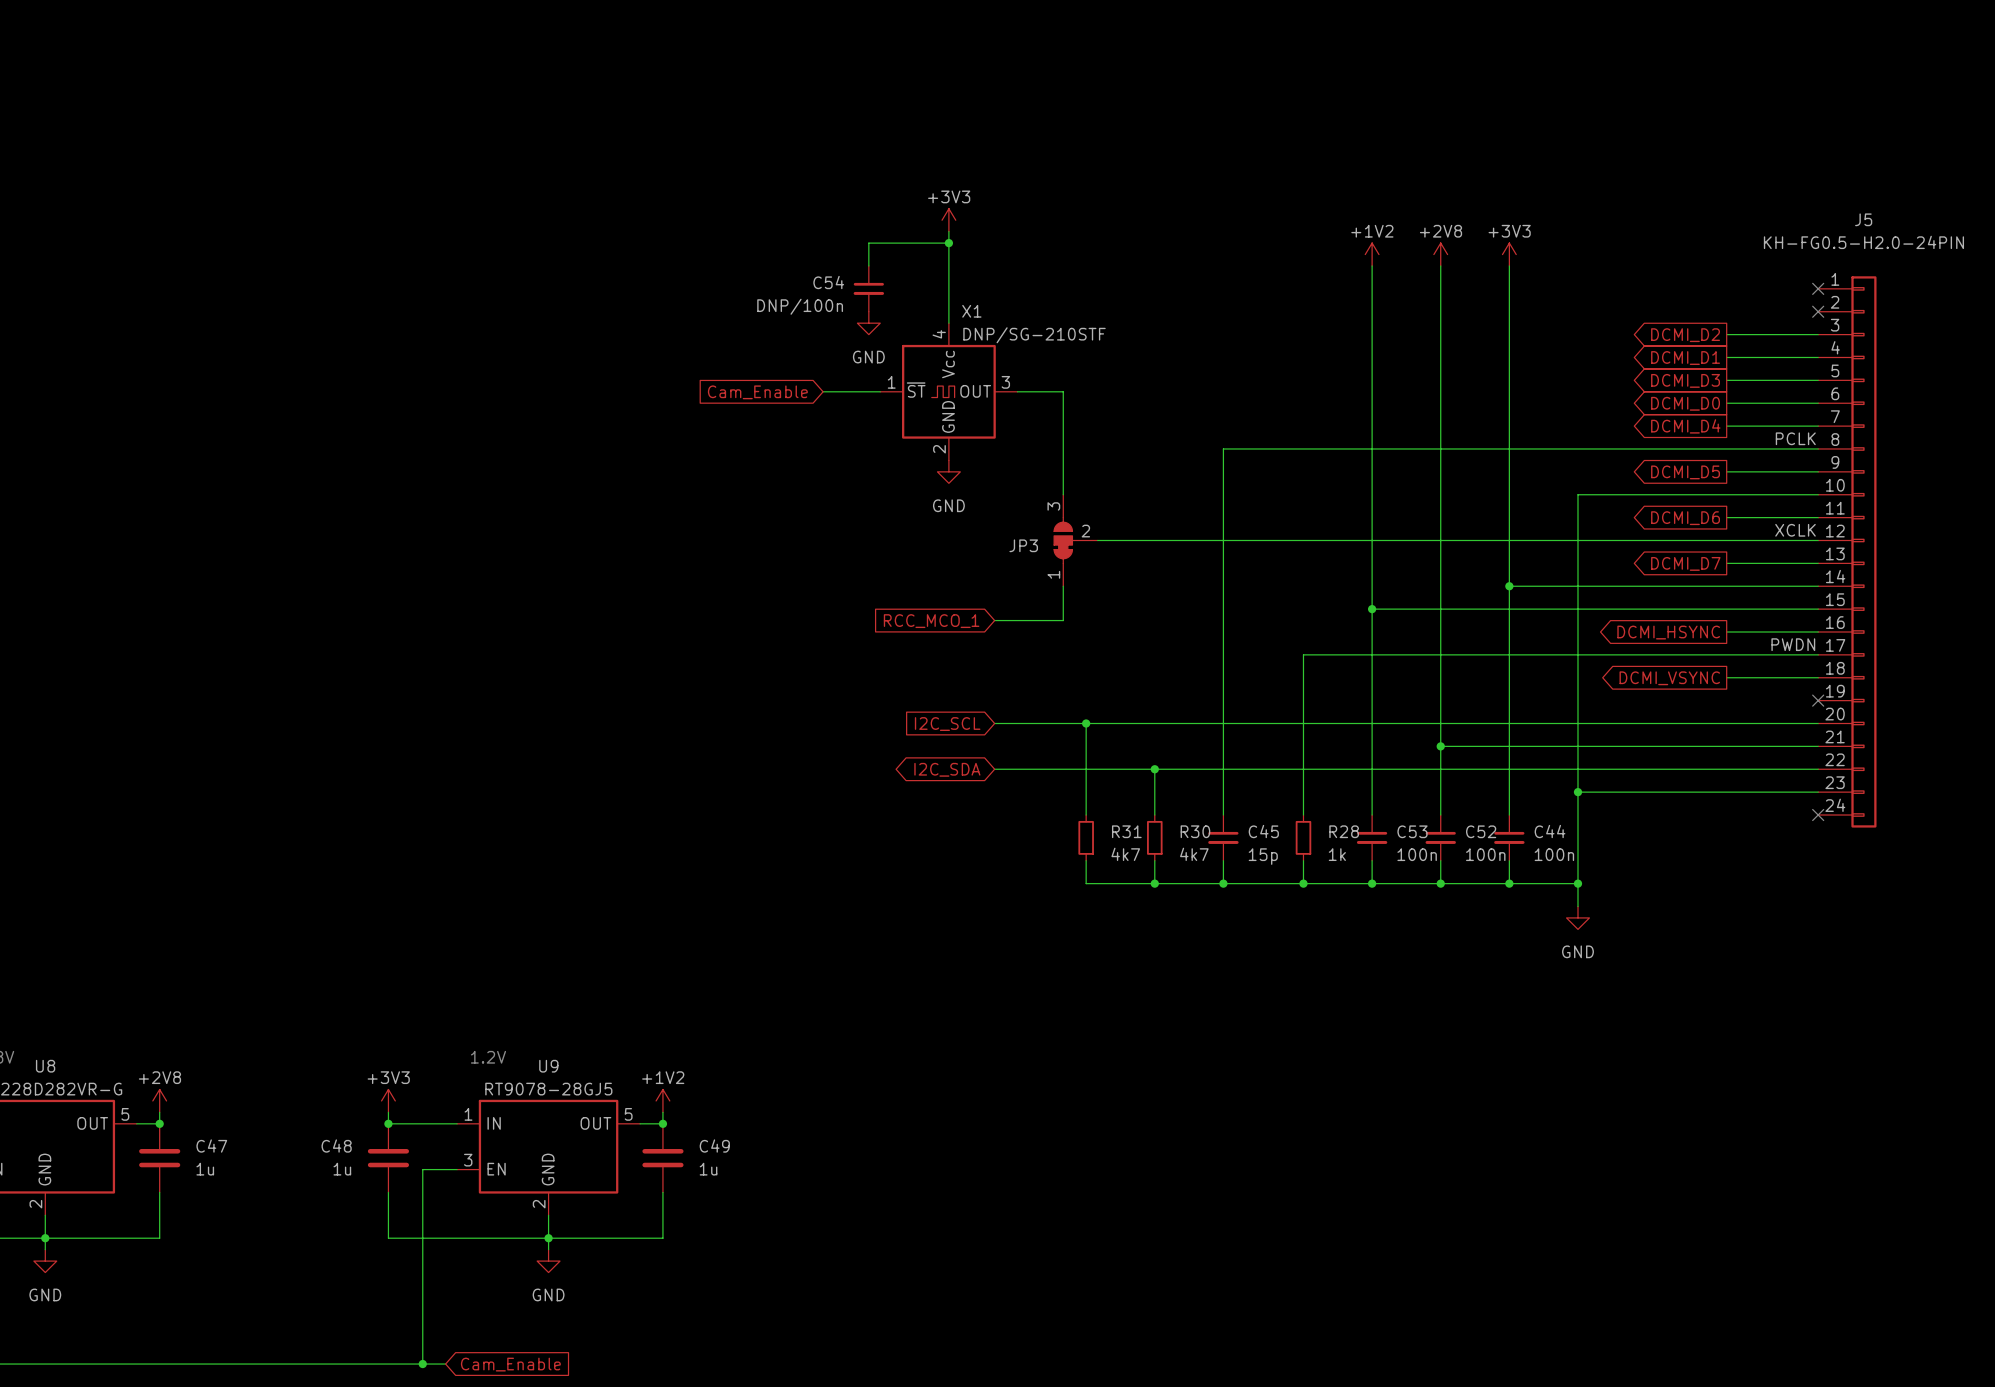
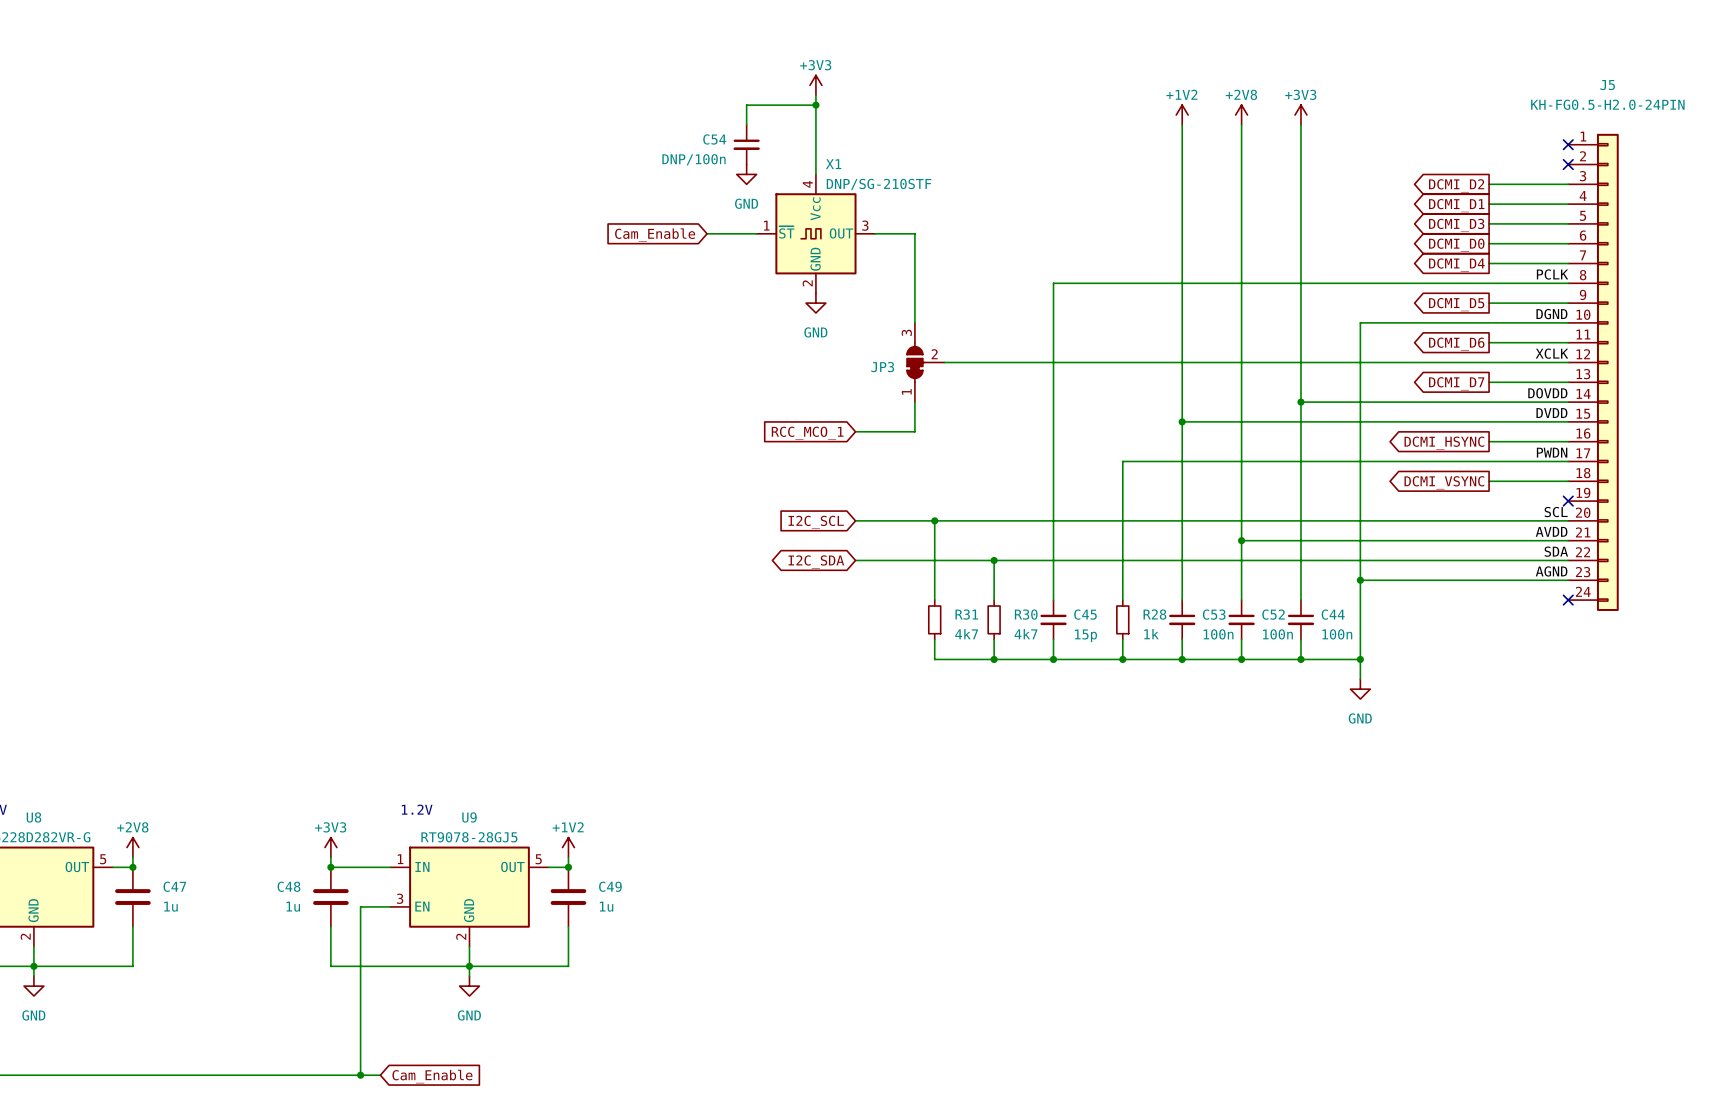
label: none -> DGND (1551, 314)
label: none -> DOVDD (1547, 393)
label: none -> DVDD (1551, 413)
label: none -> SCL (1556, 512)
label: none -> AVDD (1551, 531)
label: none -> SDA (1556, 551)
label: none -> AGND (1551, 571)

